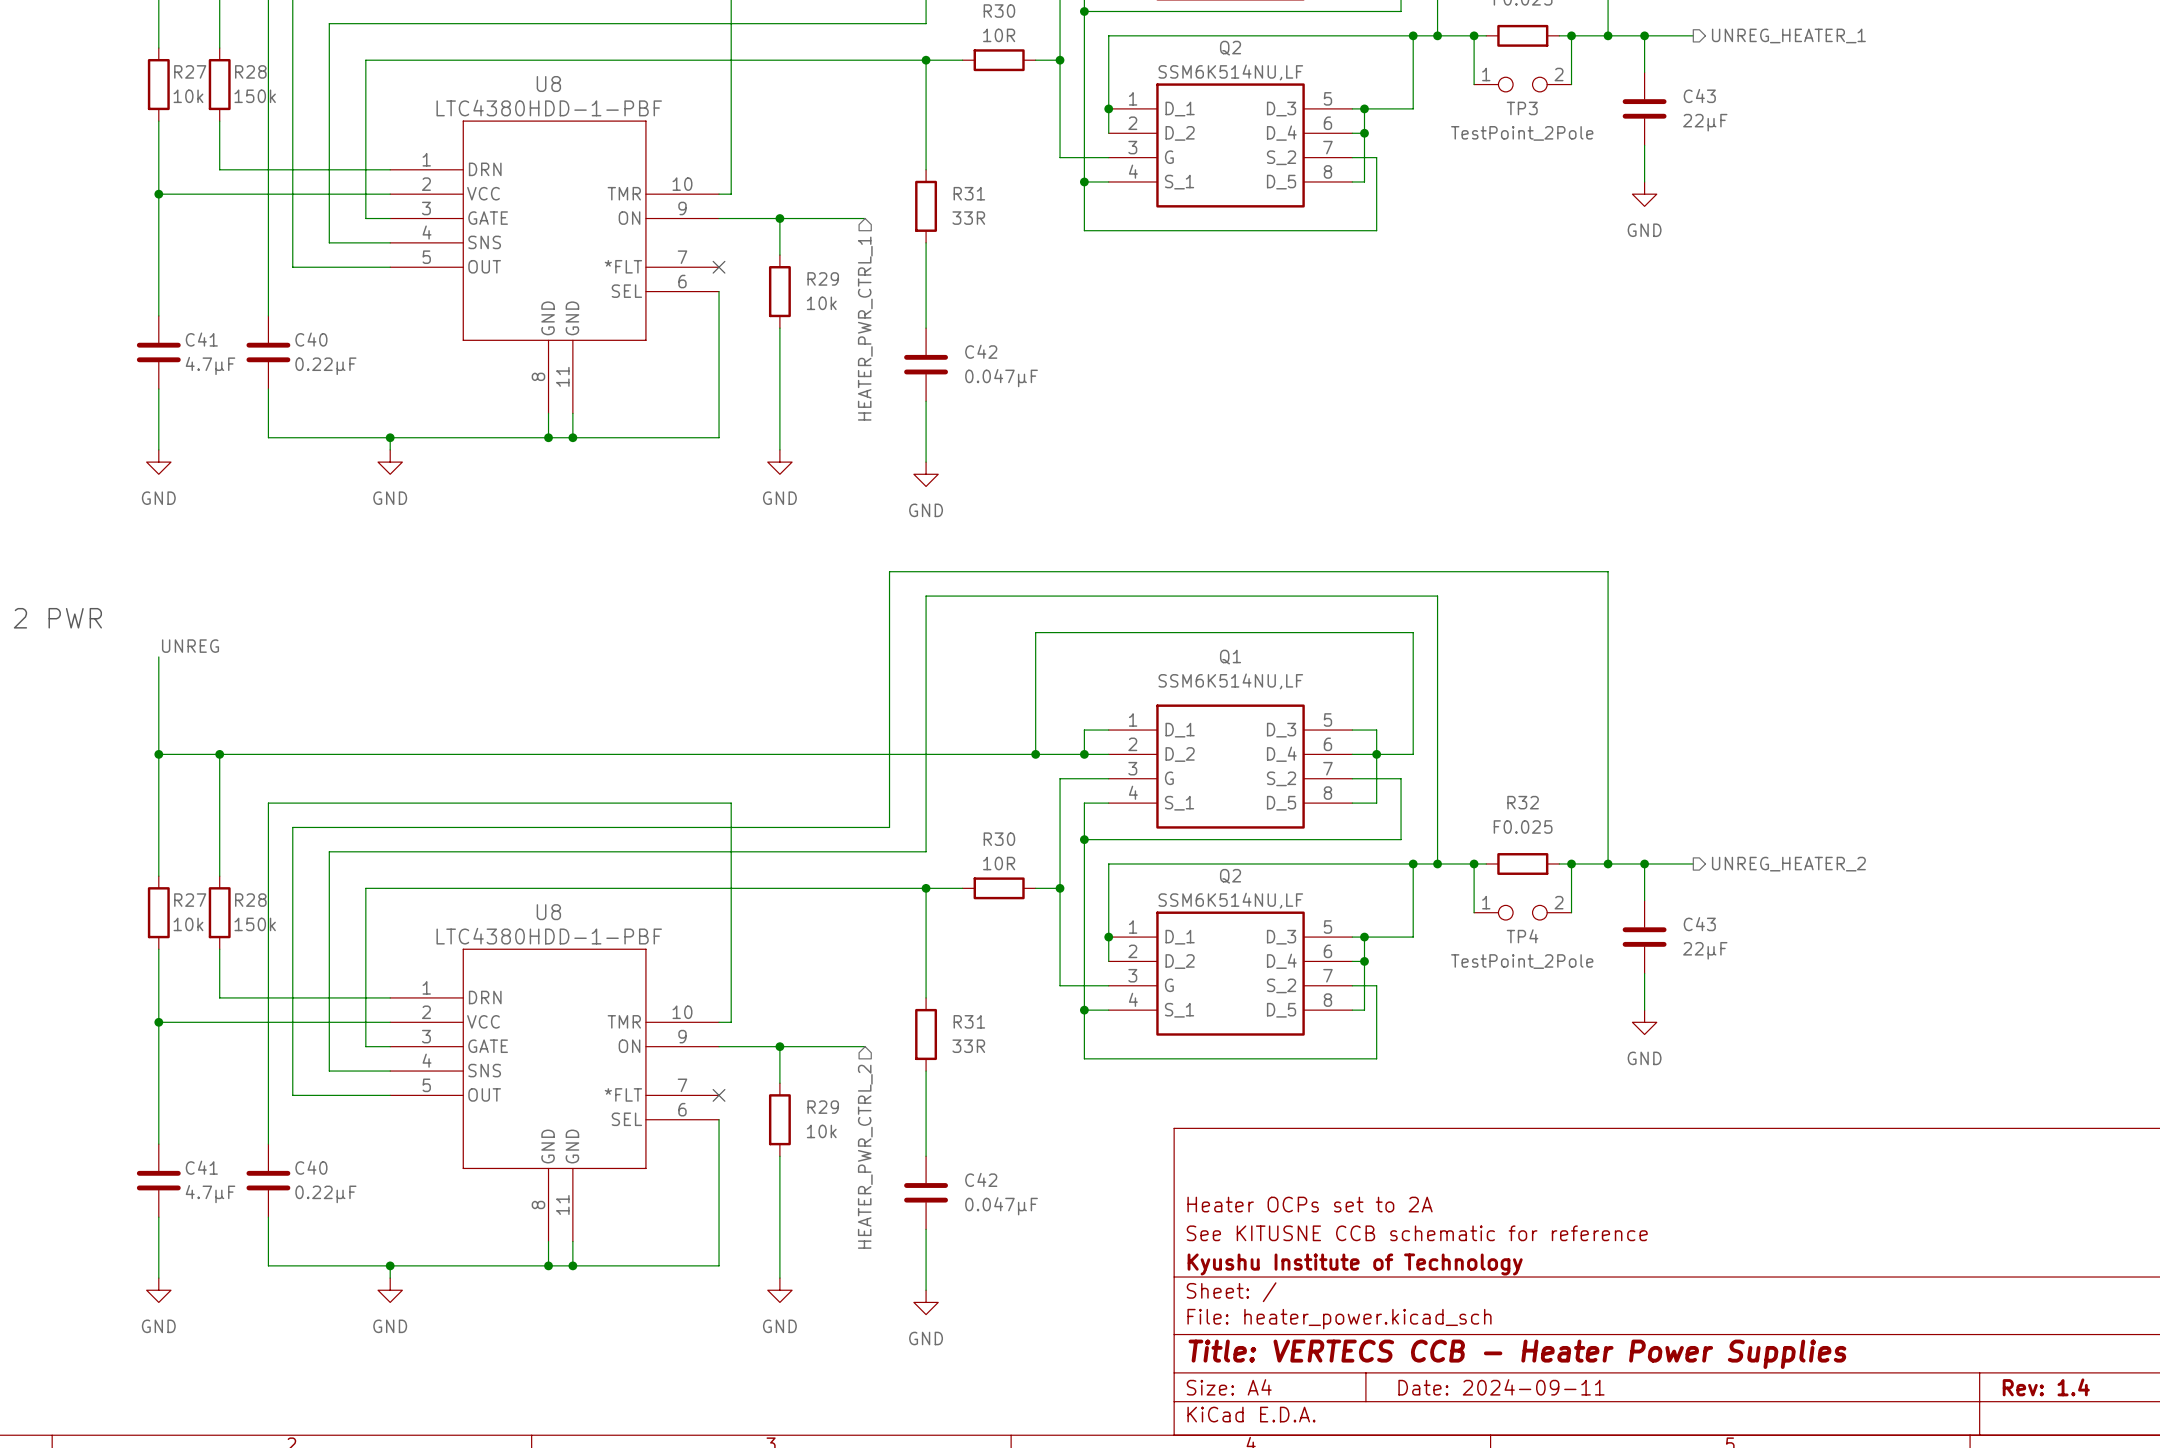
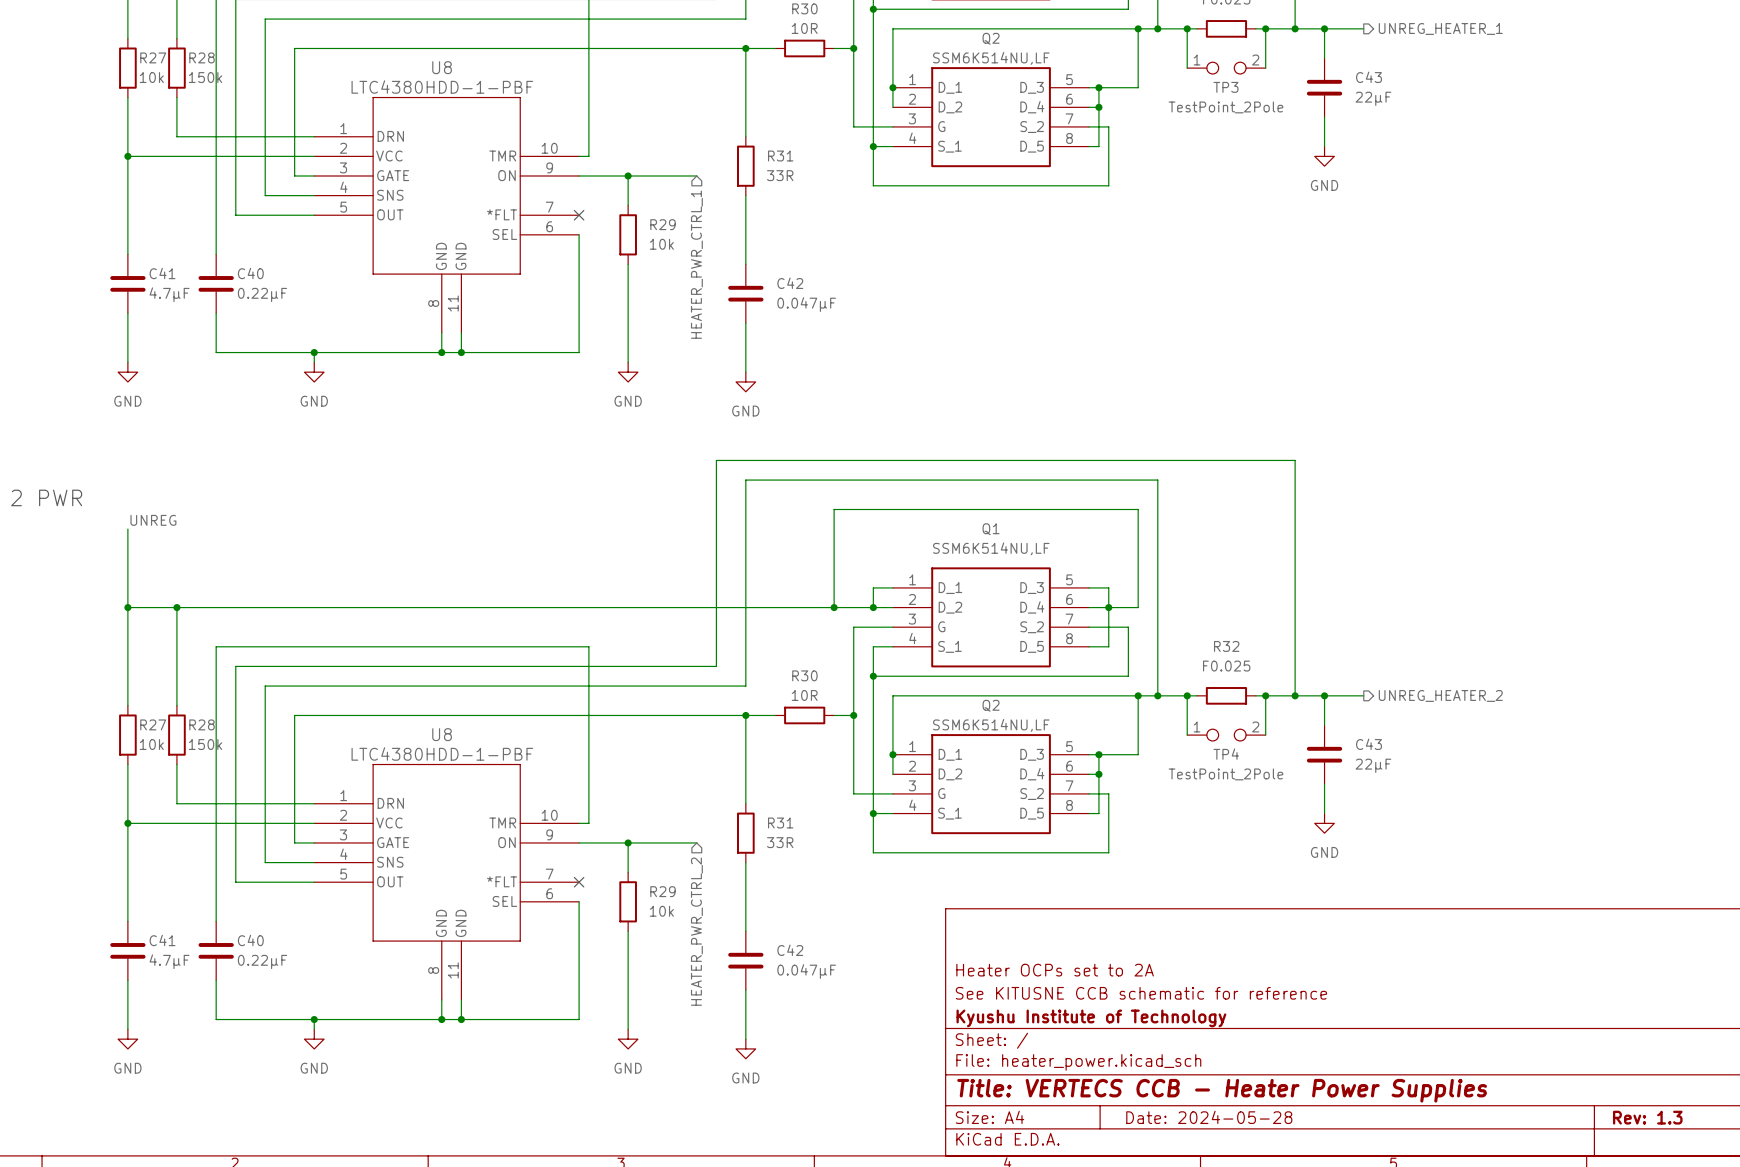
title block: Date: 2024-09-11 (1501, 1387) -> Date: 2024-05-28 (1209, 1117)
title block: Rev: 1.4 (2046, 1387) -> Rev: 1.3 (1647, 1117)

